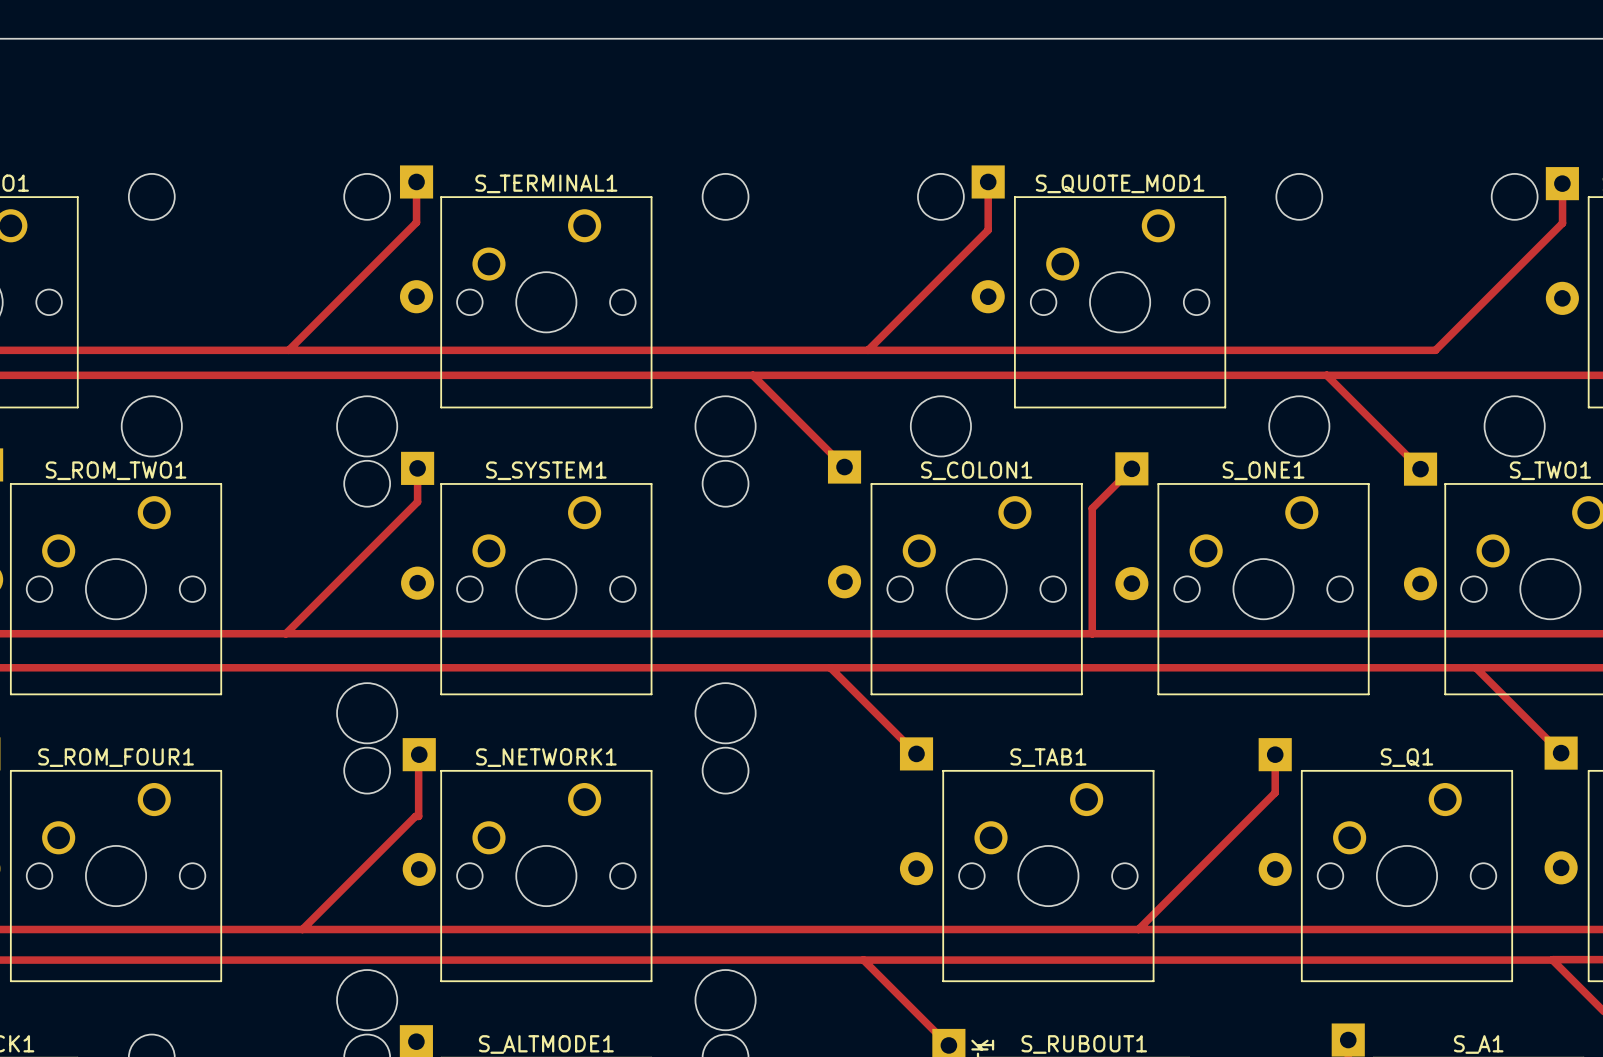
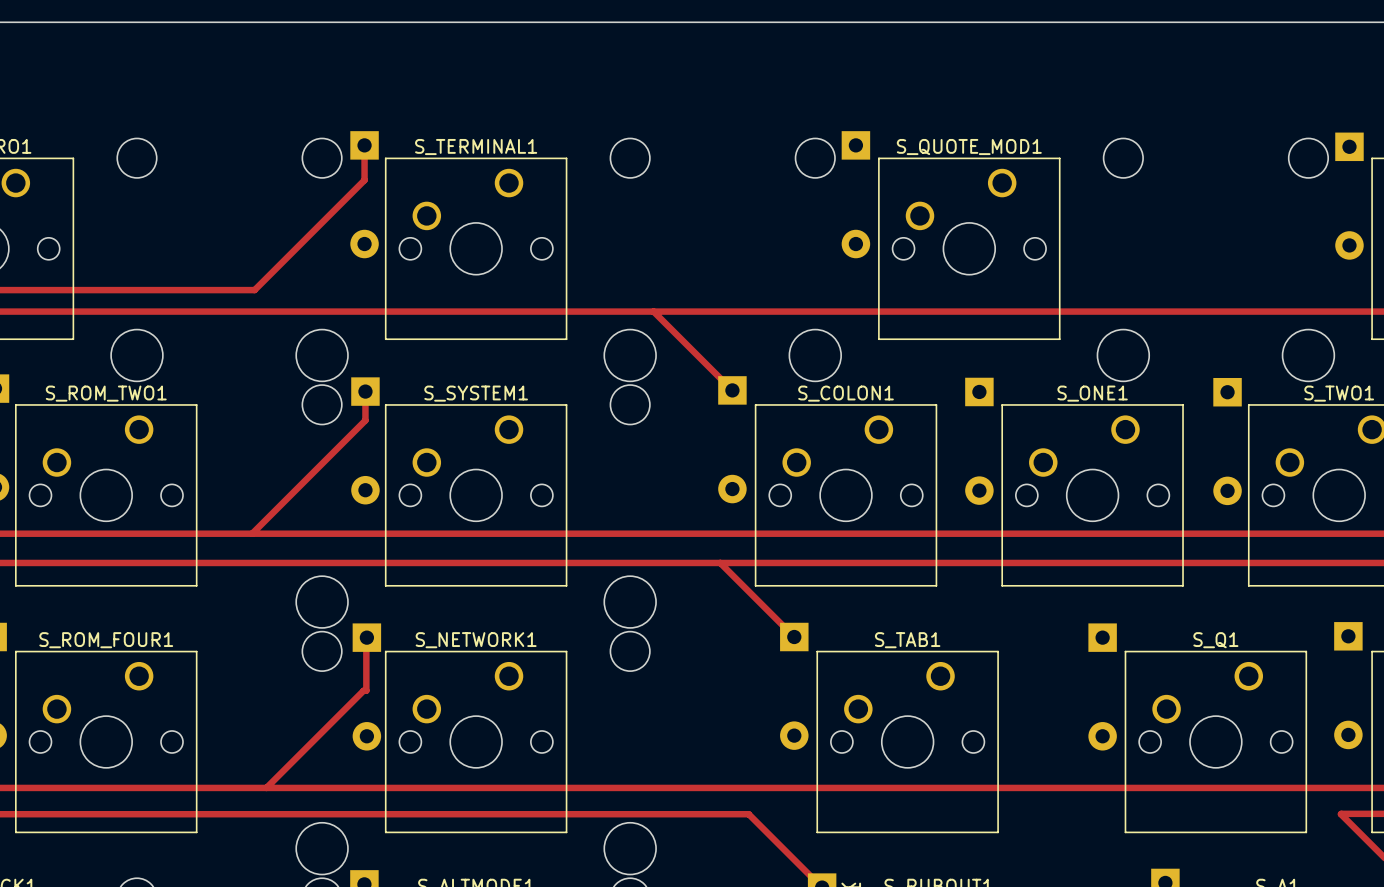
track: (988, 181) (988, 230) (868, 350) -> none
track: (1562, 183) (1562, 223) (1435, 350) (288, 350) -> none
track: (1326, 375) (1420, 469) -> none
track: (1131, 468) (1092, 508) (1092, 633) -> none
track: (1475, 667) (1561, 753) -> none
track: (1275, 754) (1275, 792) (1138, 929) -> none
track: (863, 960) (1552, 960) -> none

